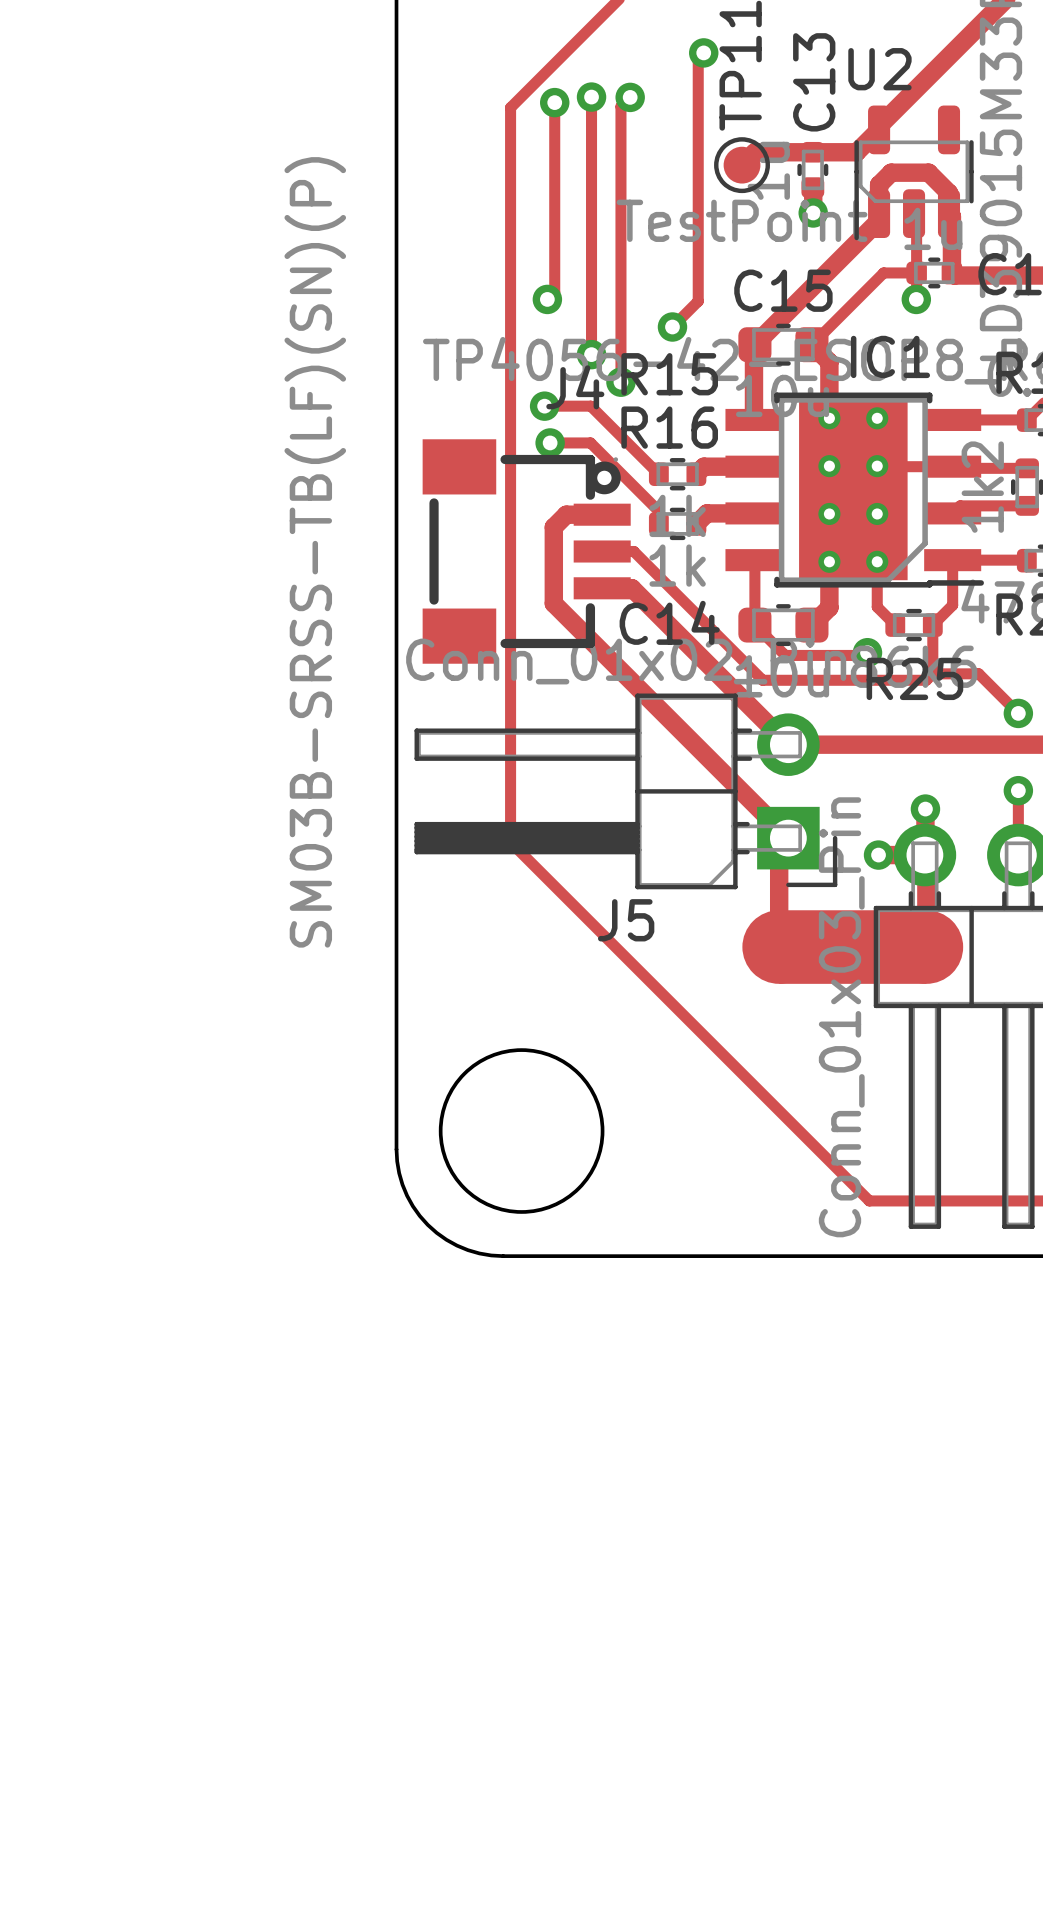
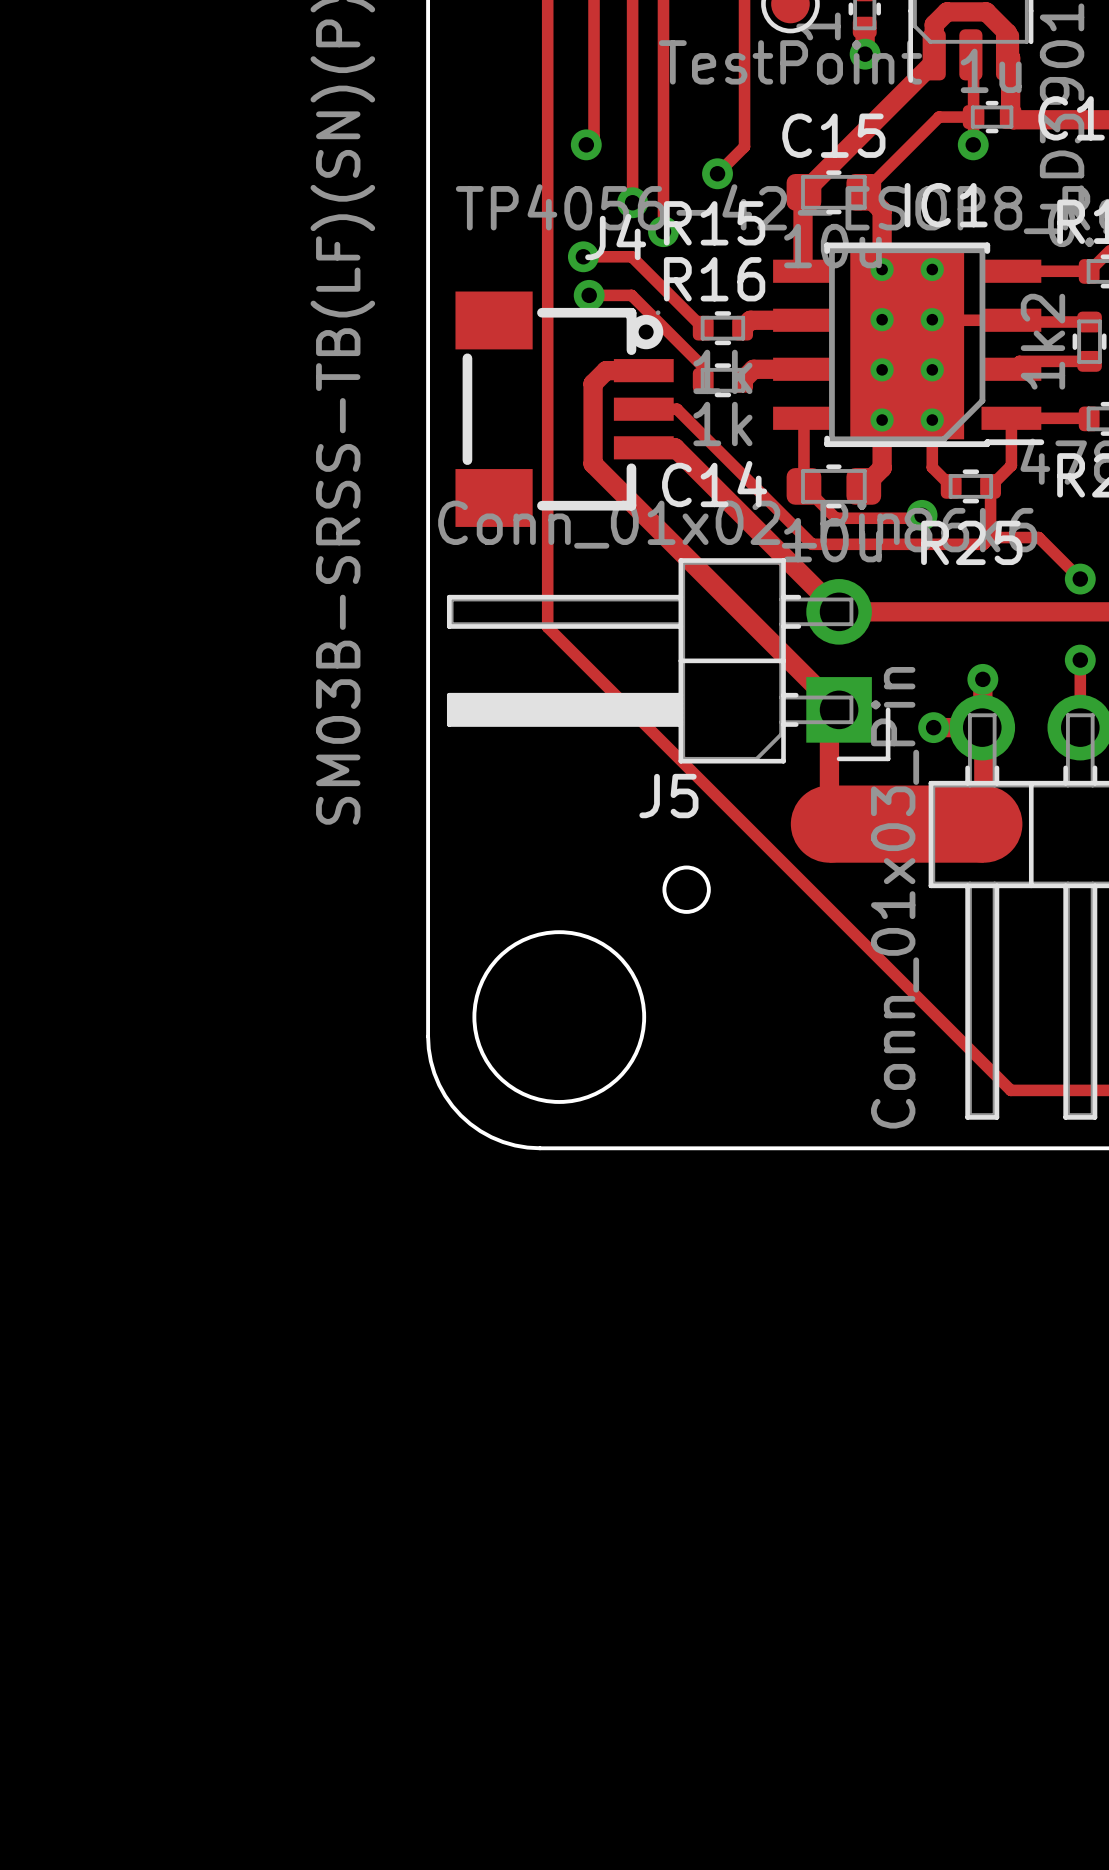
track: (510, 759) (510, 842) (869, 1200) (952, 1200) -> (547, 627) (1010, 1090)
round board edge: none -> [662, 865, 711, 914]

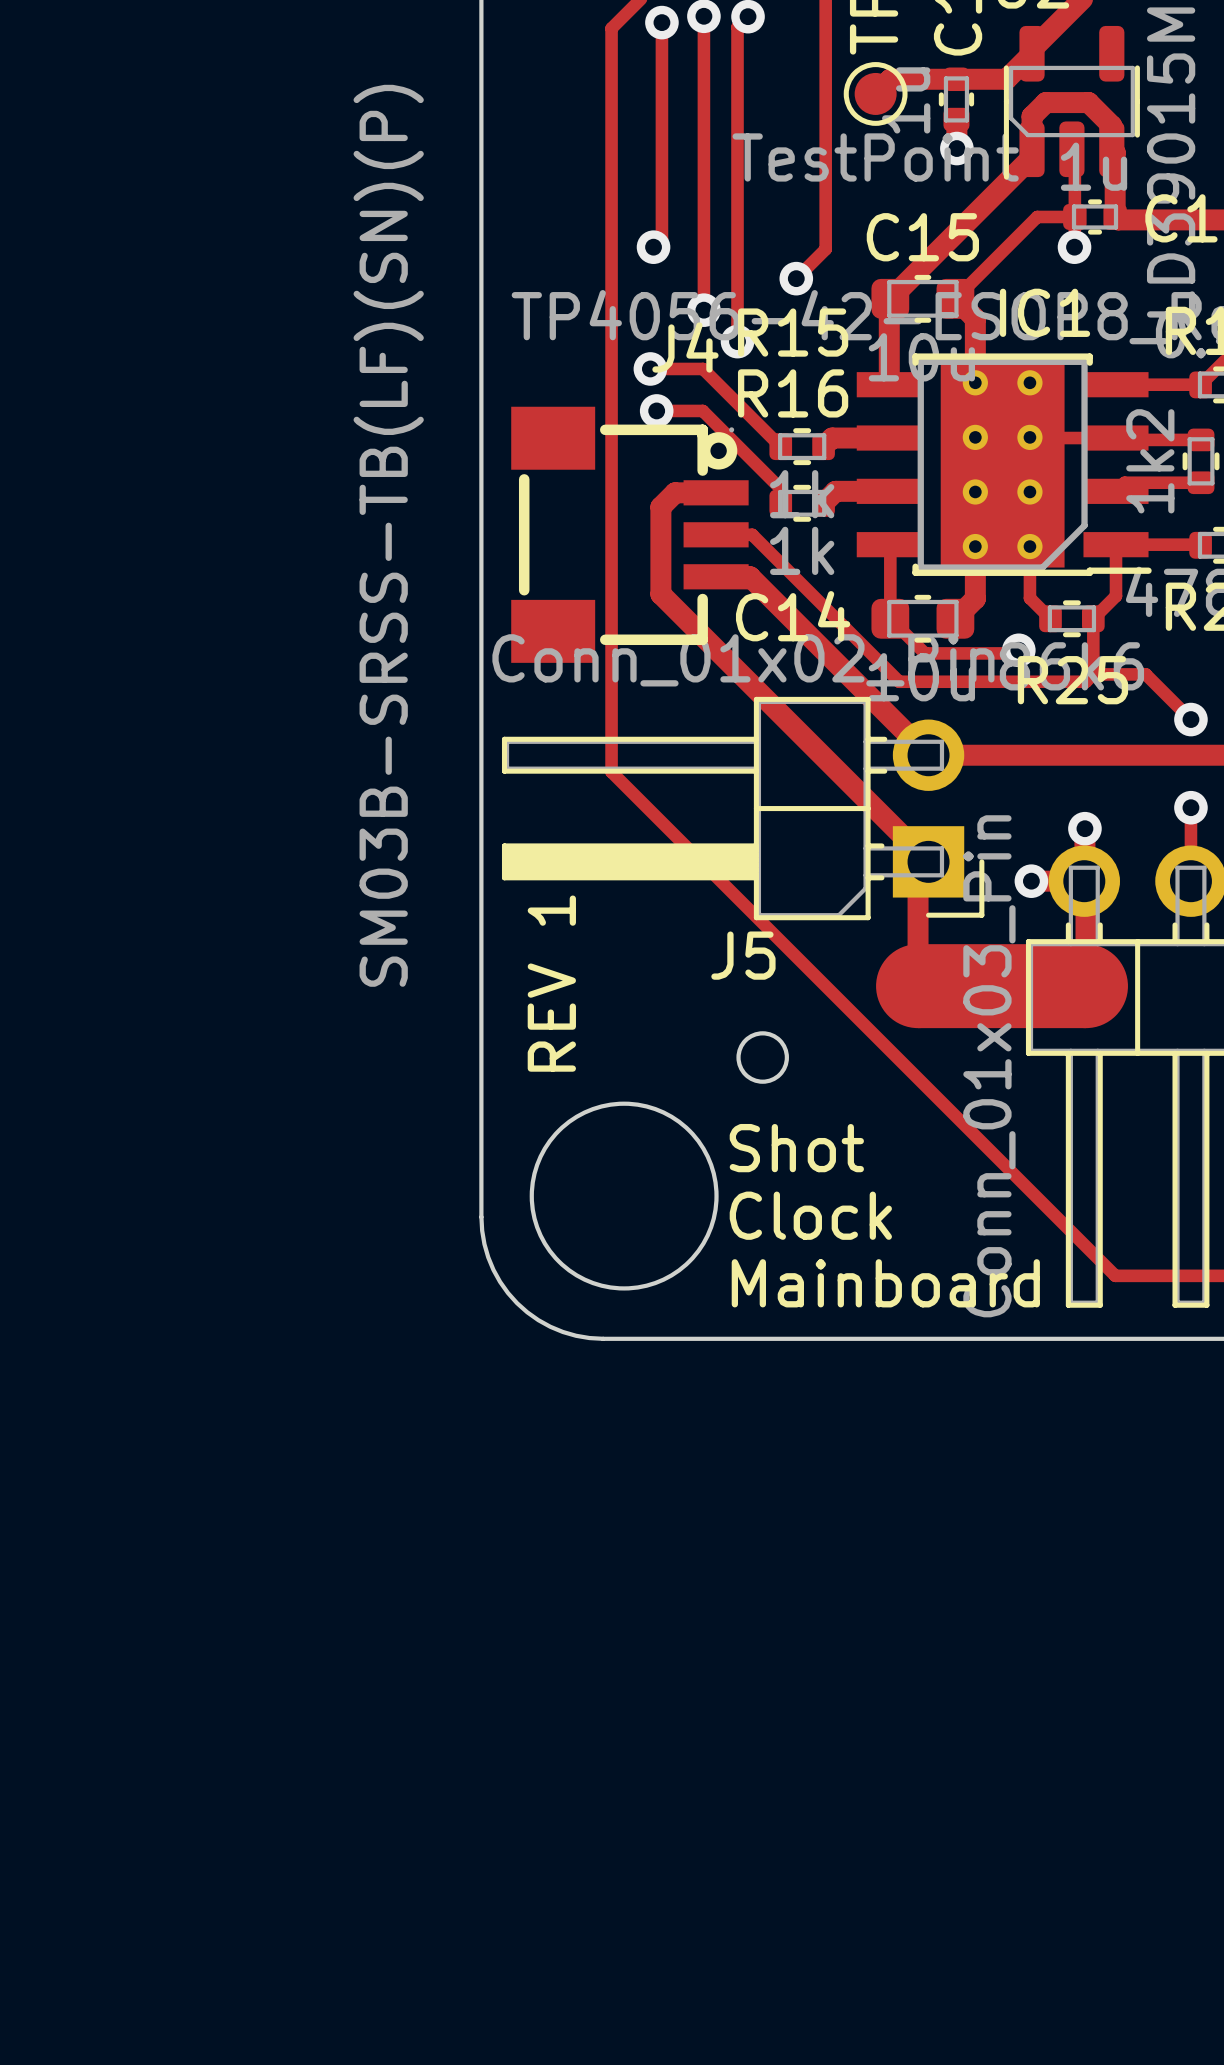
text: none -> REV 1 (551, 983)
text: none -> Shot (796, 1148)
text: none -> Clock (810, 1215)
text: none -> Mainboard (885, 1283)

